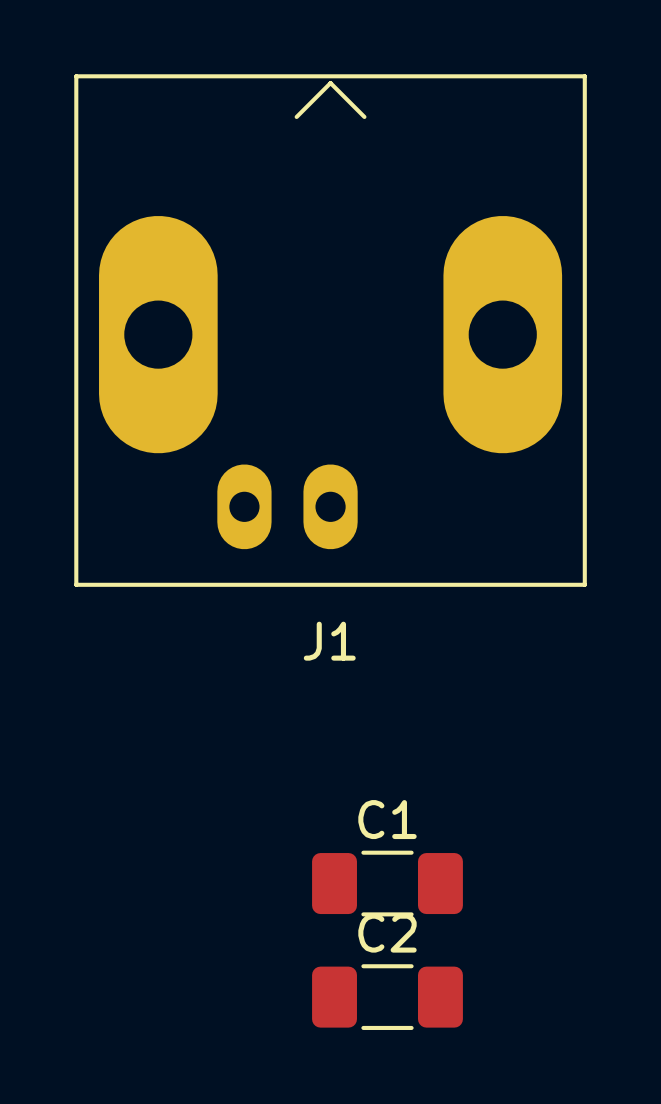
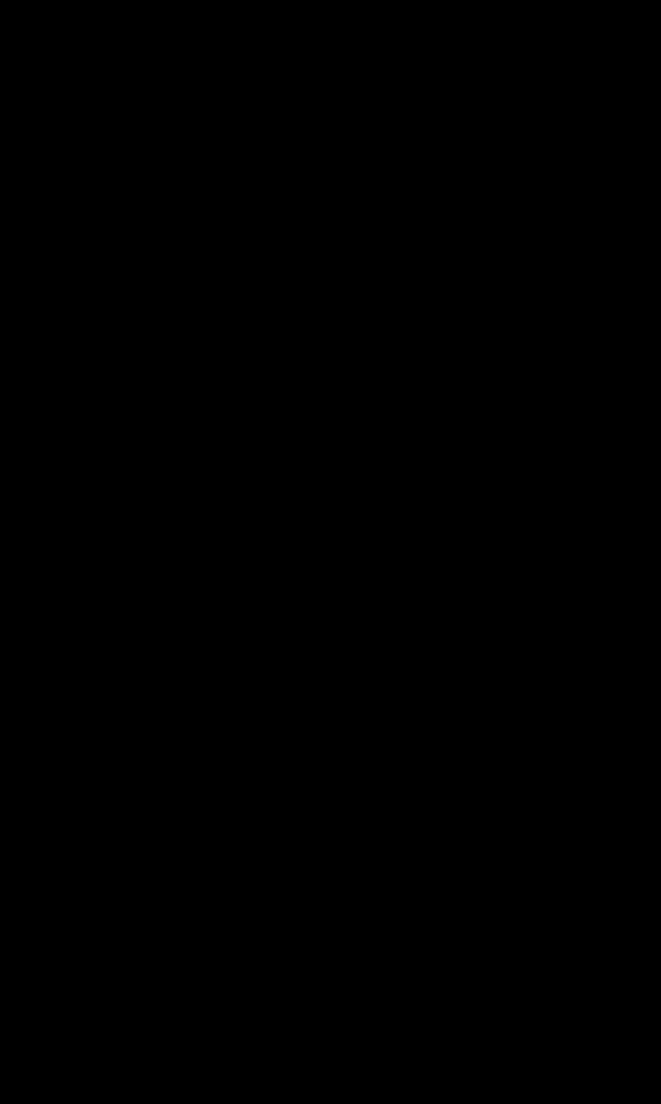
J1: (330, 330) -> none
C1: (387, 883) -> none
C2: (387, 997) -> none

